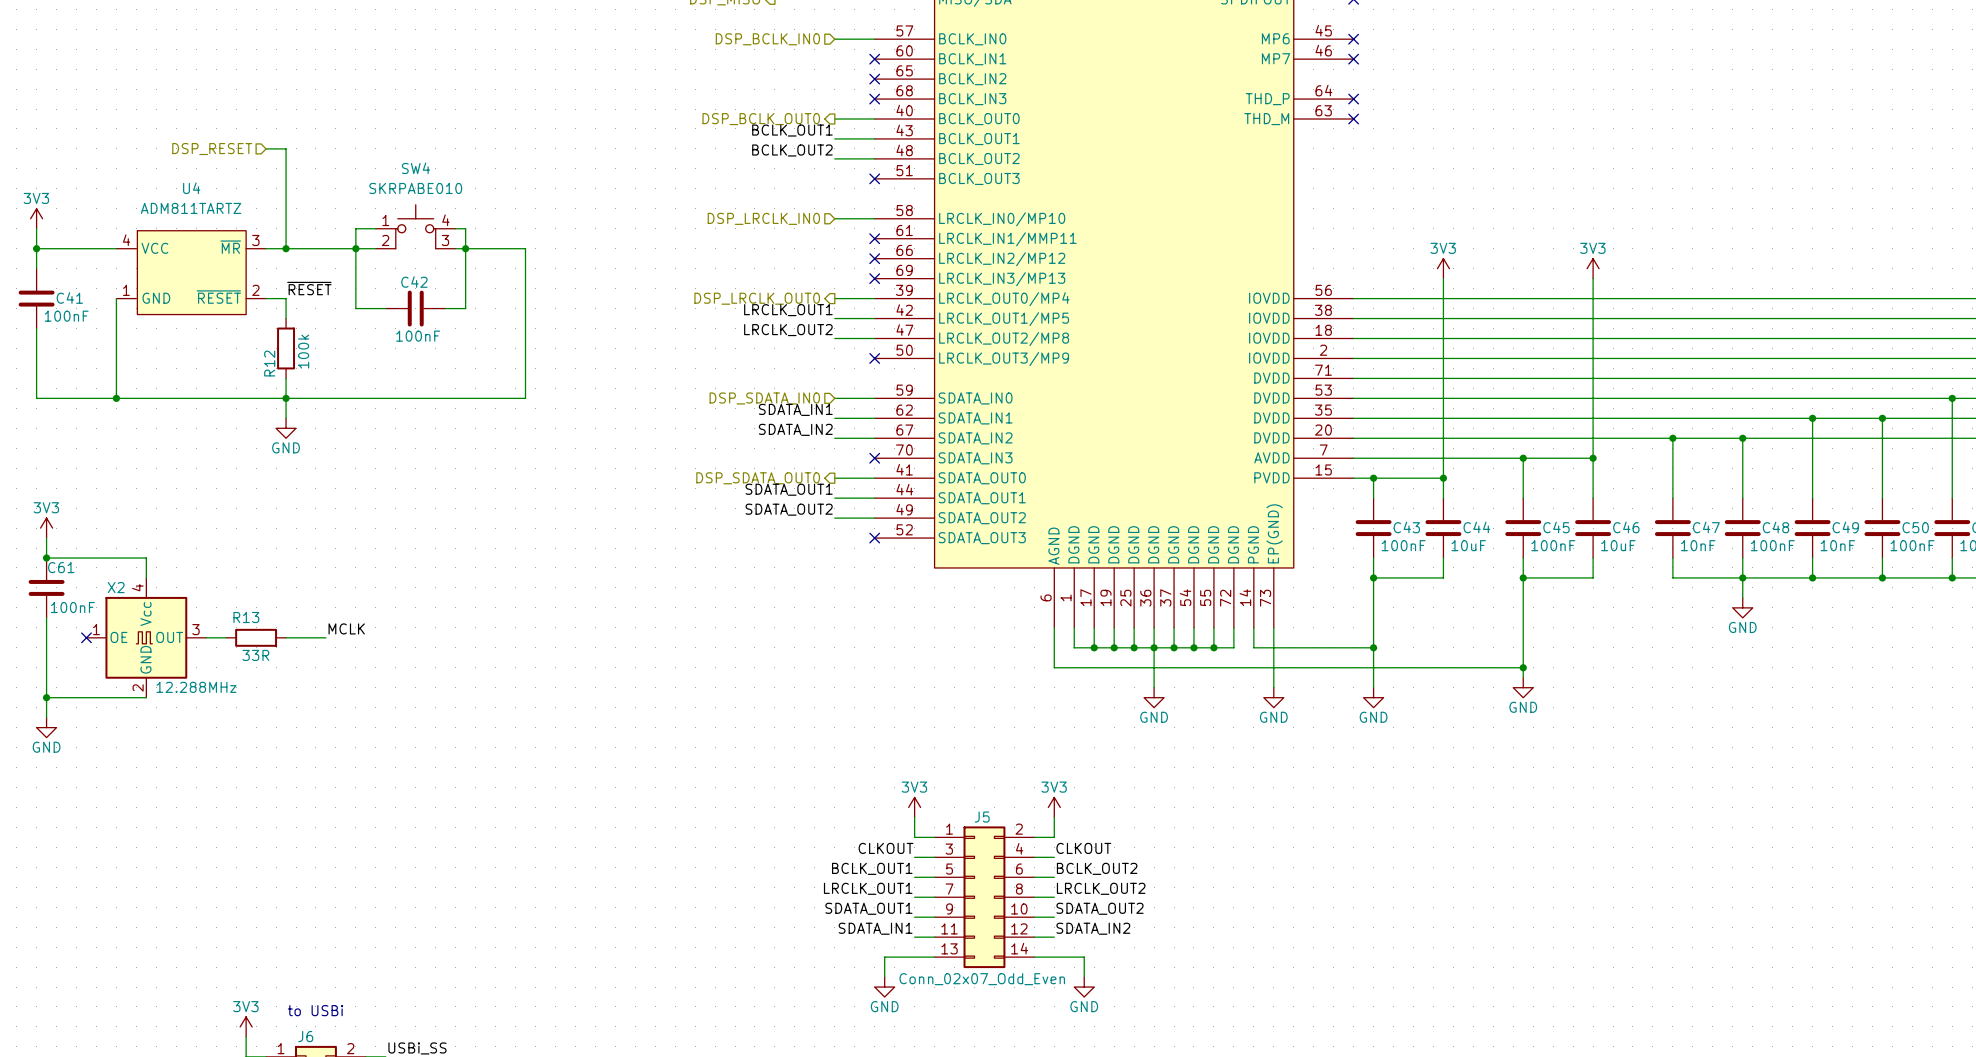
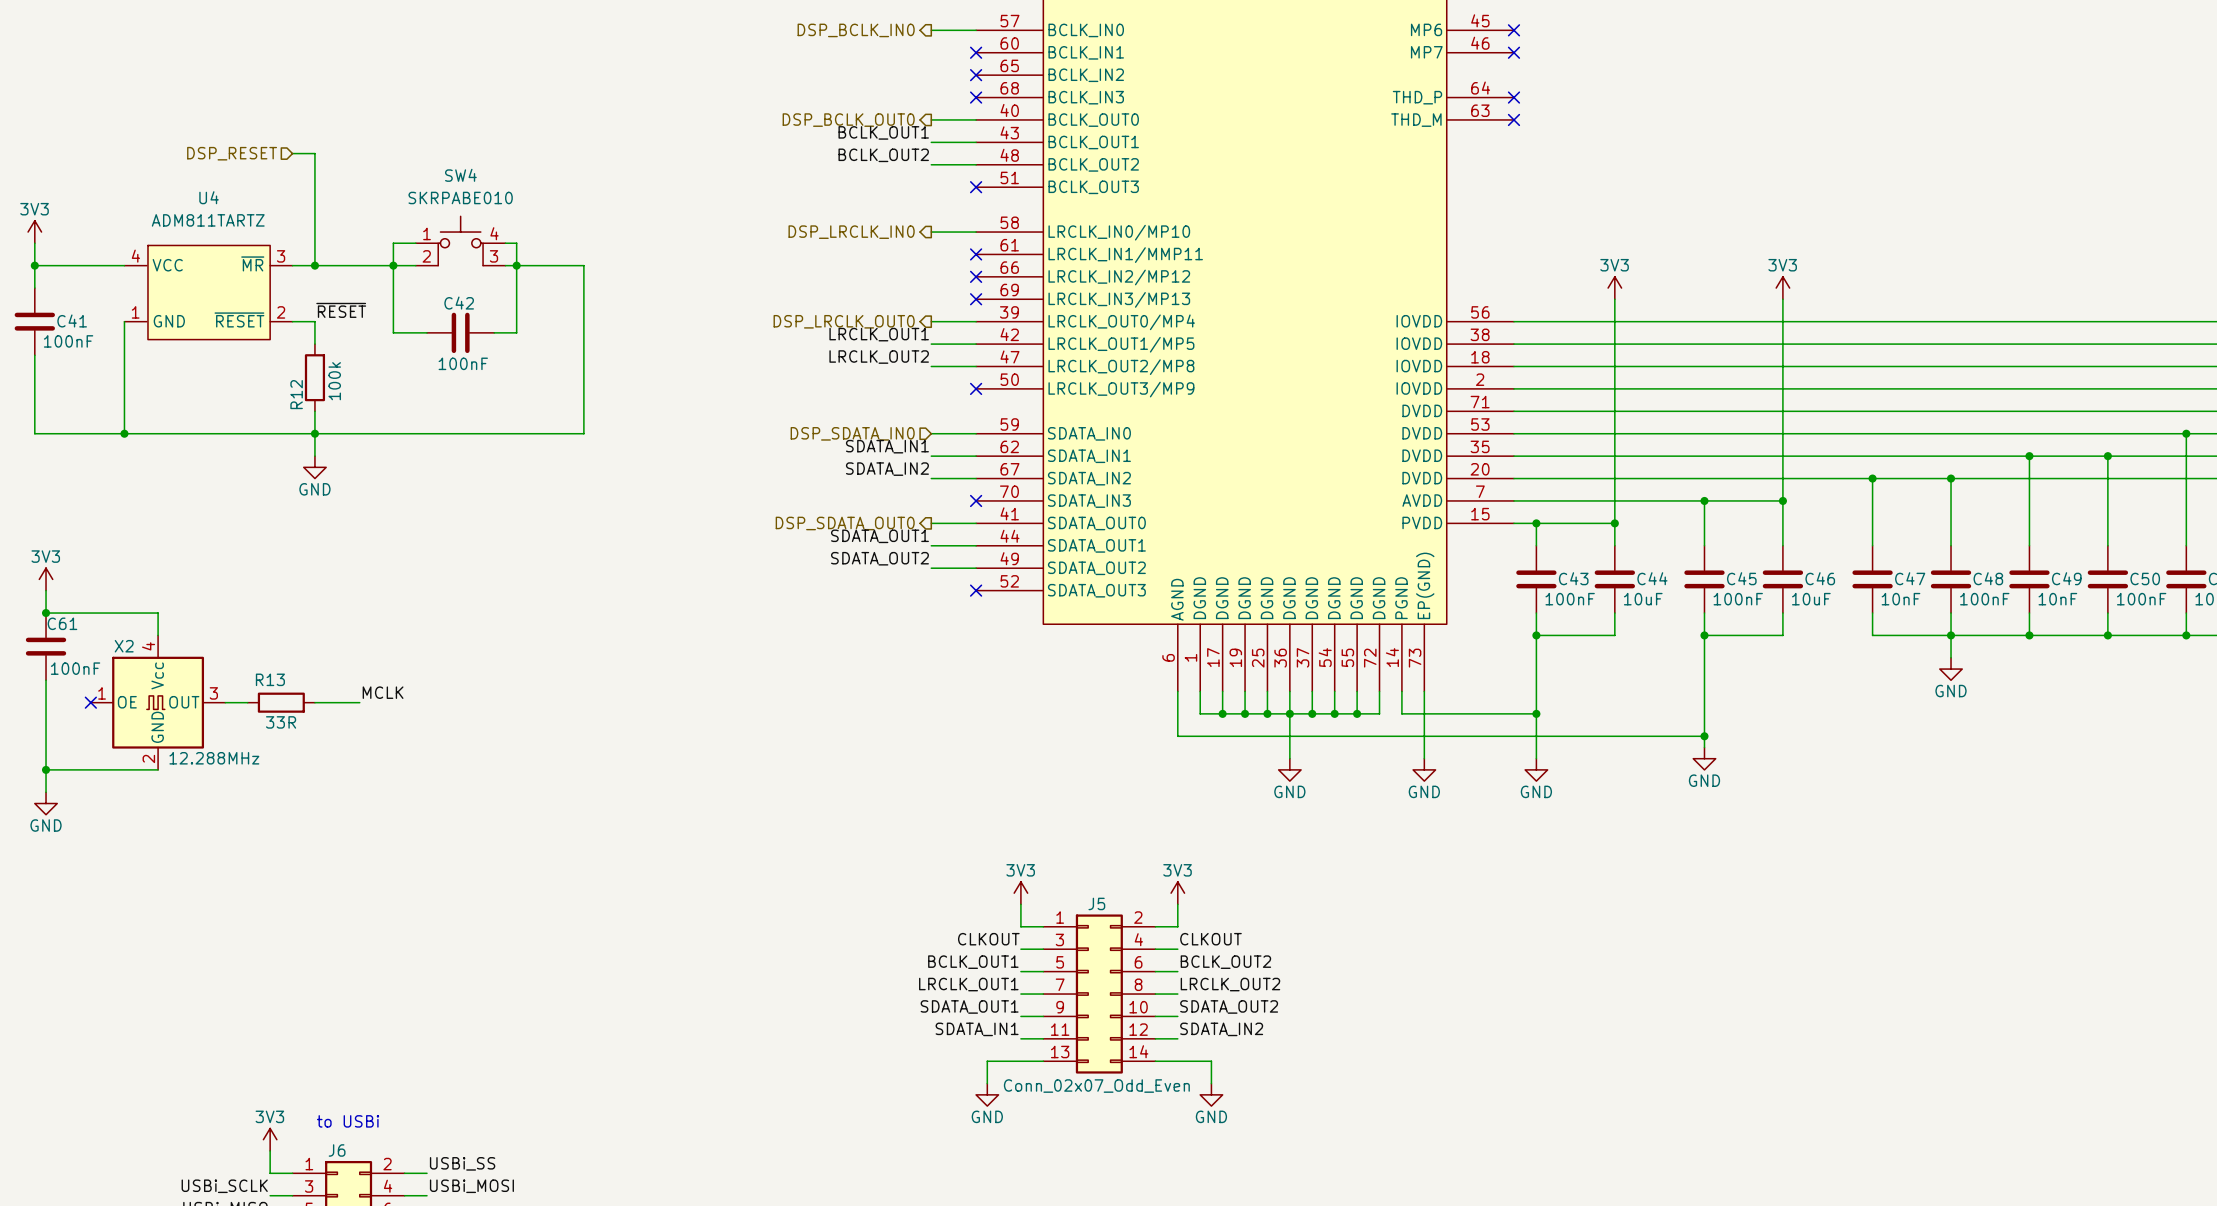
hierarchical label shape: input (767, 39) -> output (856, 30)
hierarchical label shape: input (763, 218) -> output (851, 232)

